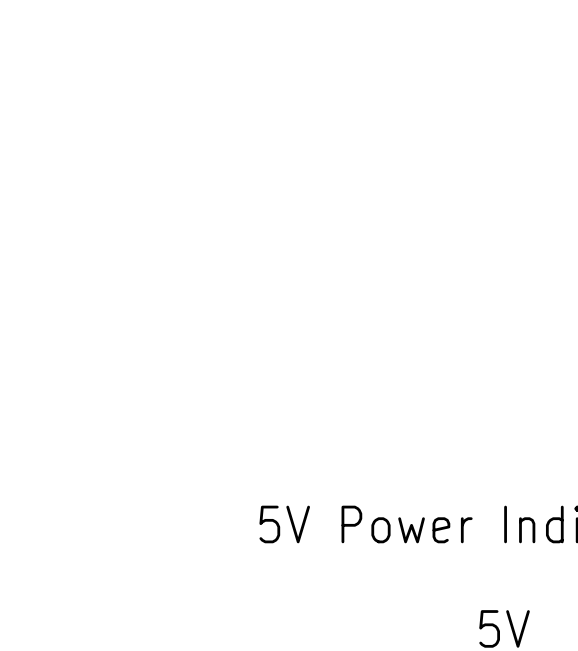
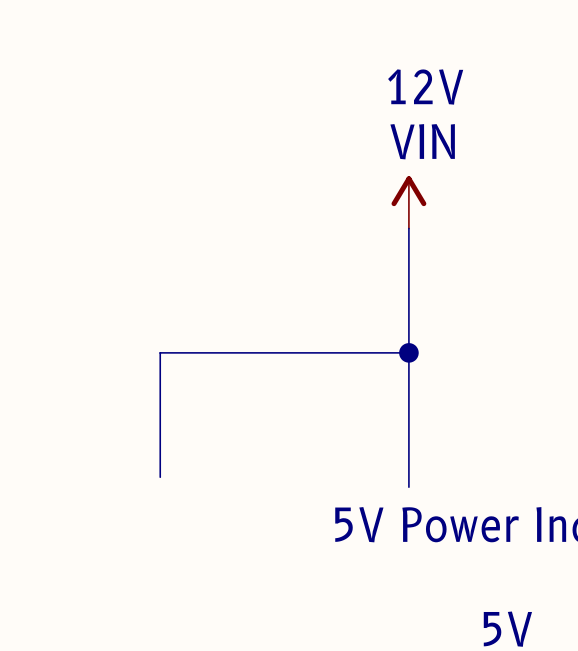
text: none -> 12V (425, 87)
power symbol: none -> VIN (408, 202)
wire: none -> (408, 228) (408, 487)
wire: none -> (408, 352) (160, 352) (160, 477)
junction: none -> (408, 352)

